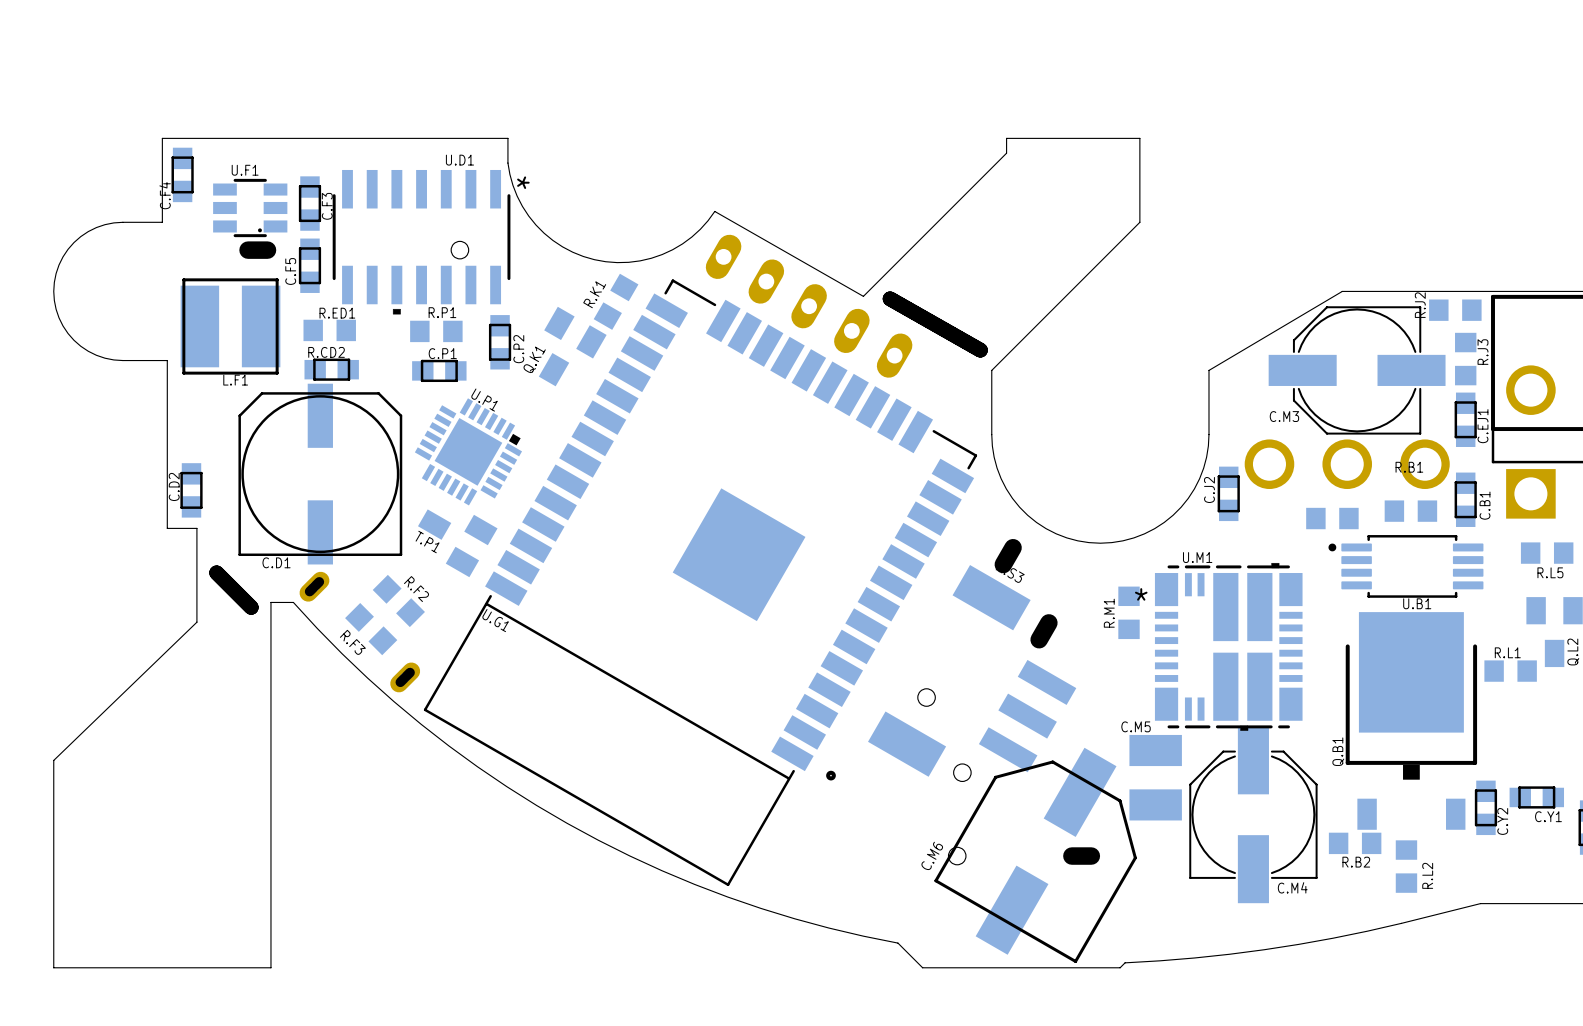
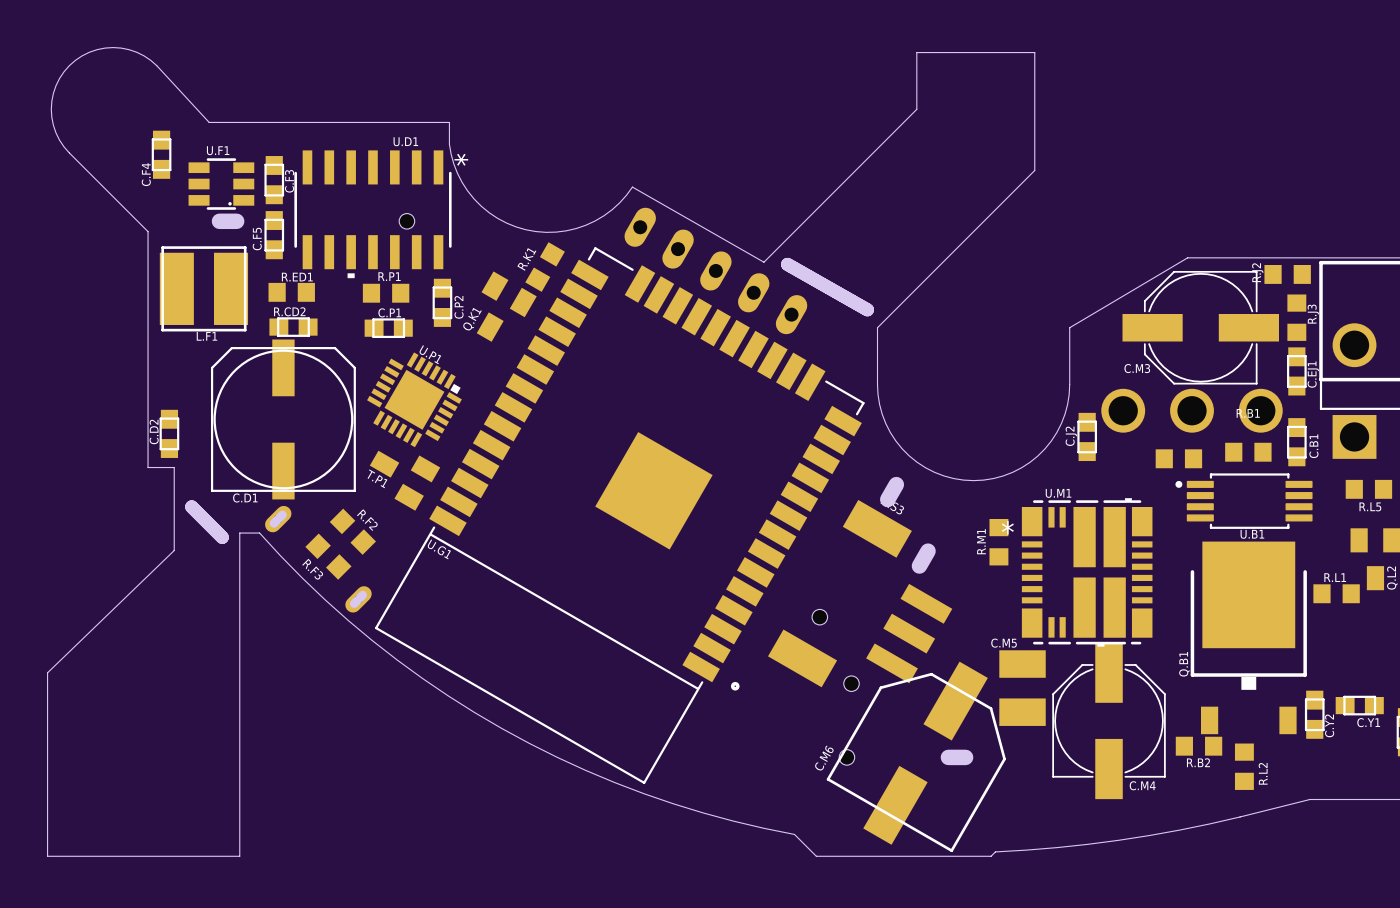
board edge: (236, 138) (162, 138) (162, 222) (113, 222) (96, 227) (80, 236) (68, 249) (56, 273) (53, 291) (56, 309) (68, 333) (80, 346) (96, 355) (113, 359) (167, 360) -> (209, 122) (150, 60) (136, 52) (121, 48) (105, 48) (82, 55) (64, 71) (53, 93) (51, 117) (56, 132) (64, 146) (148, 231) (148, 319)
board edge: (1006, 153) (1006, 138) (1139, 138) (1139, 222) -> (890, 135) (916, 109) (916, 52) (1034, 52) (1034, 170) (1008, 196)

